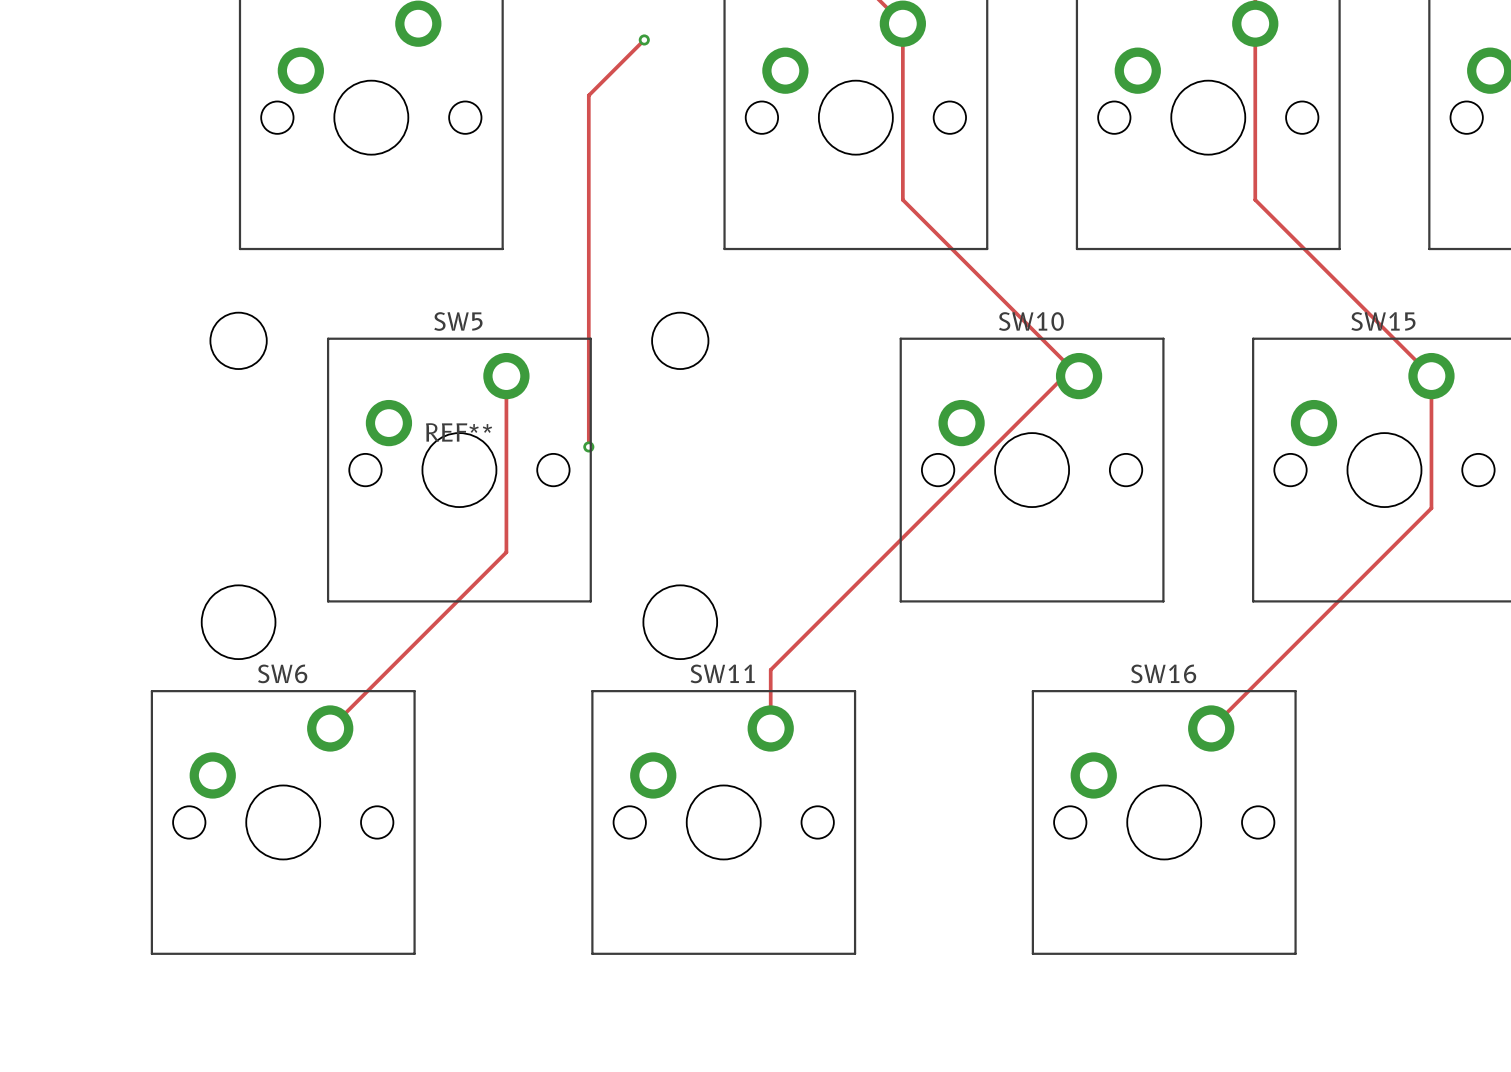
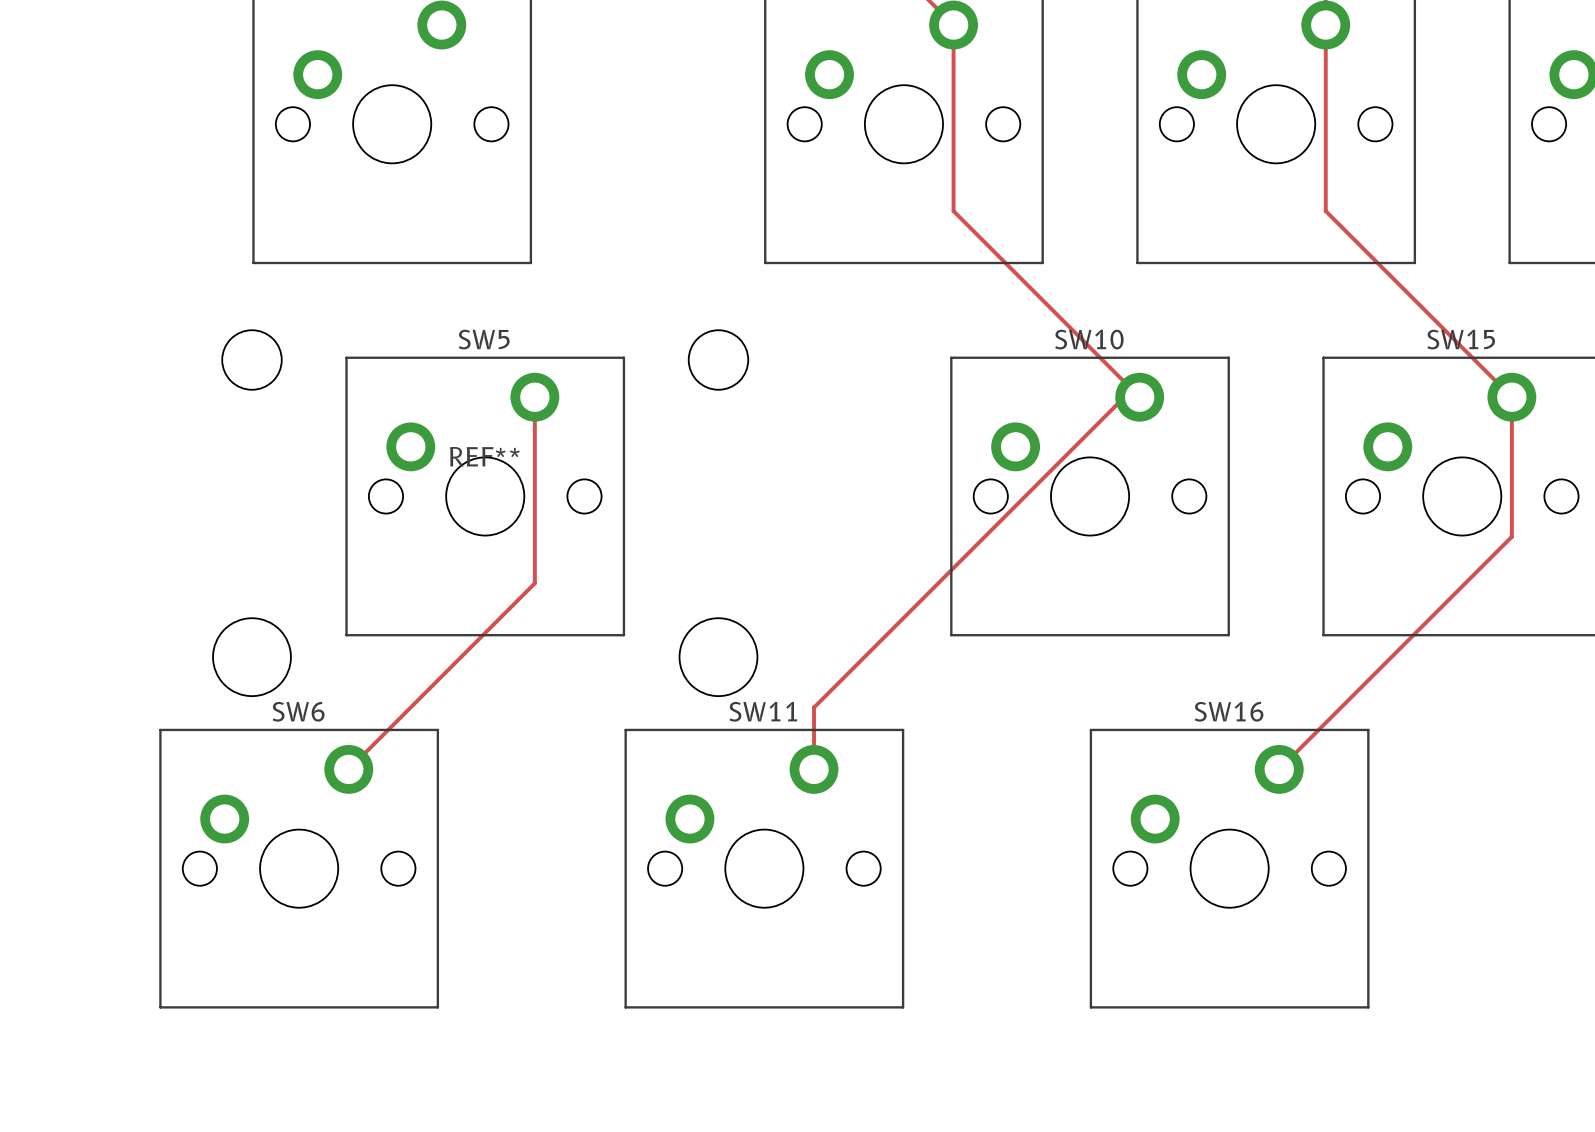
track: (644, 39) (588, 95) (588, 446) -> none
via: (644, 39) -> none
via: (588, 446) -> none

